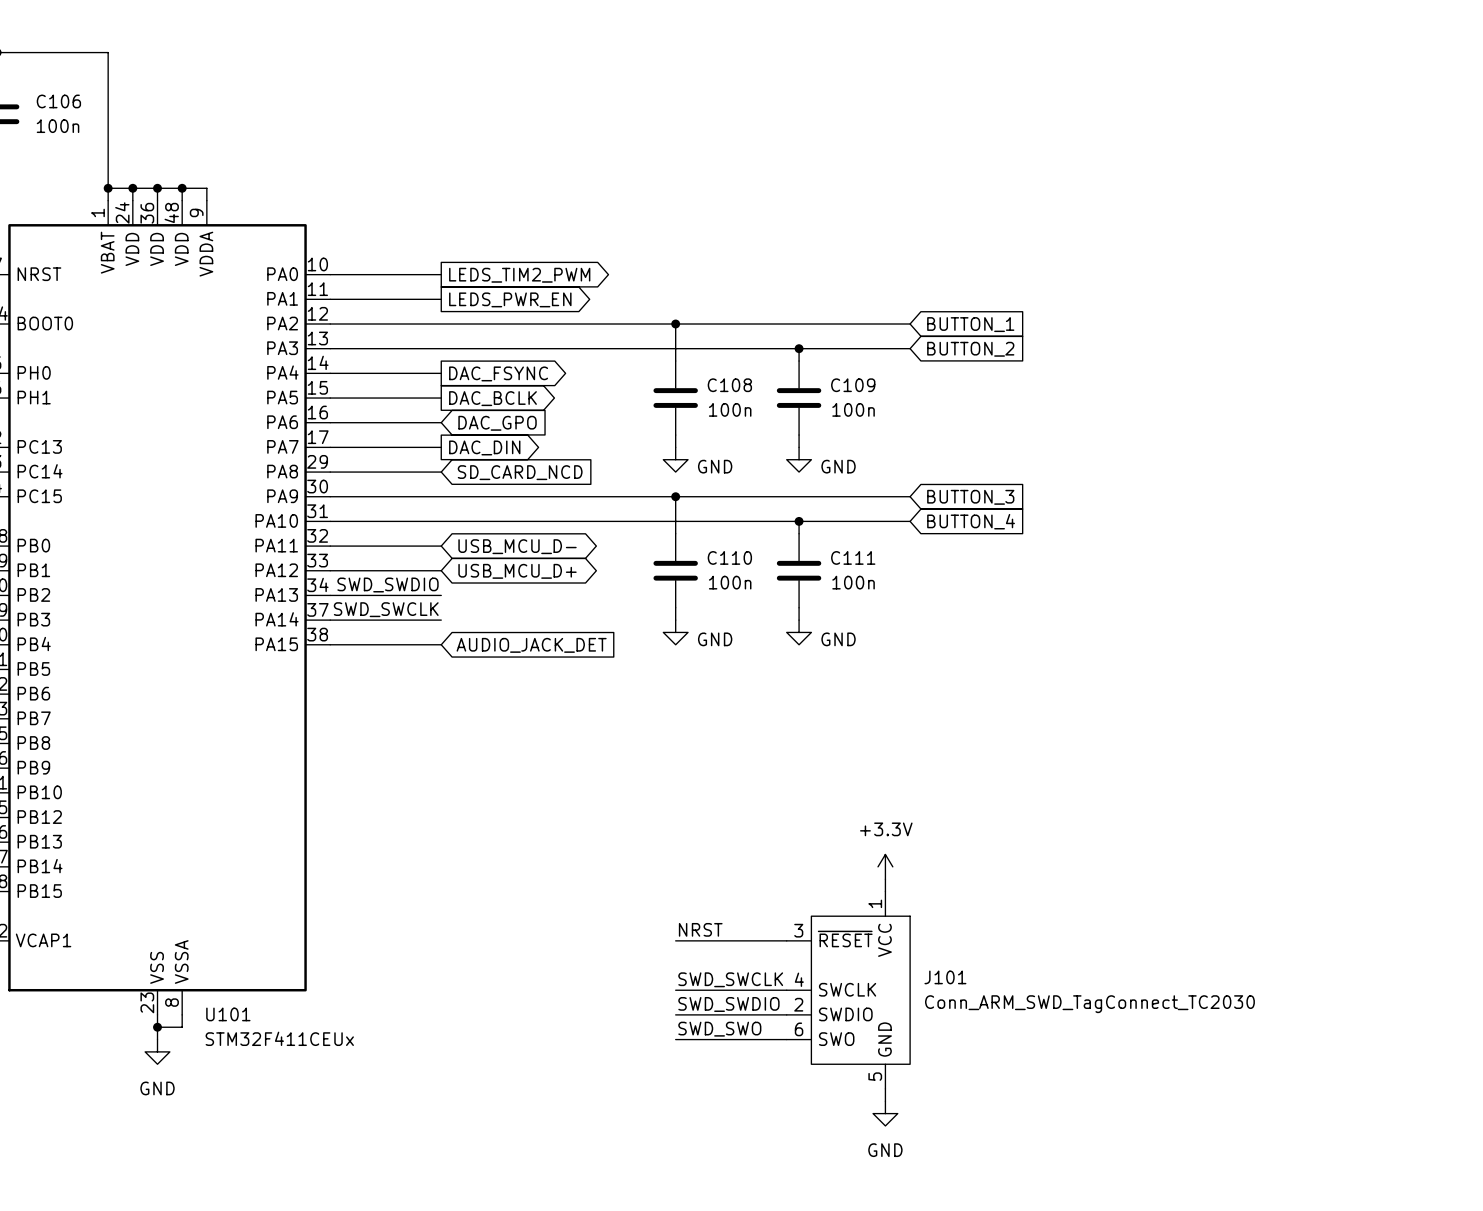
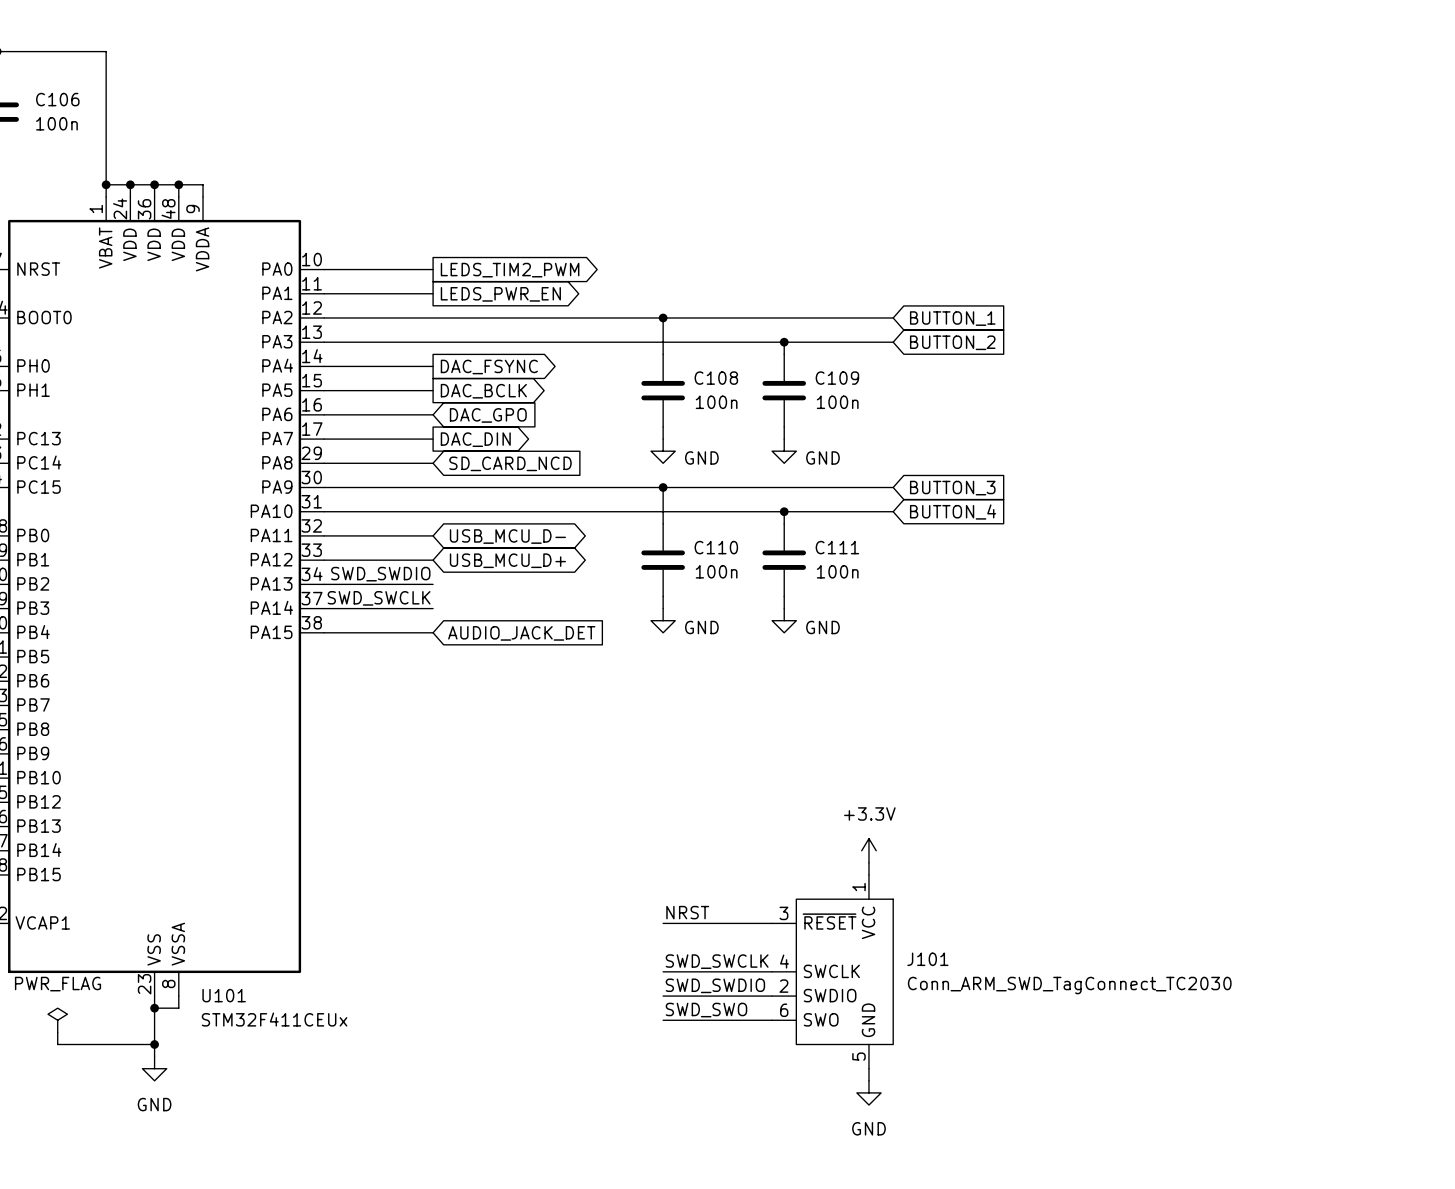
power symbol: none -> PWR_FLAG (57, 1020)
wire: none -> (154, 1020) (154, 1056)
wire: none -> (57, 1032) (57, 1044) (154, 1044)
power symbol position: GND (157, 1051) -> GND (154, 1068)
junction: none -> (154, 1044)

